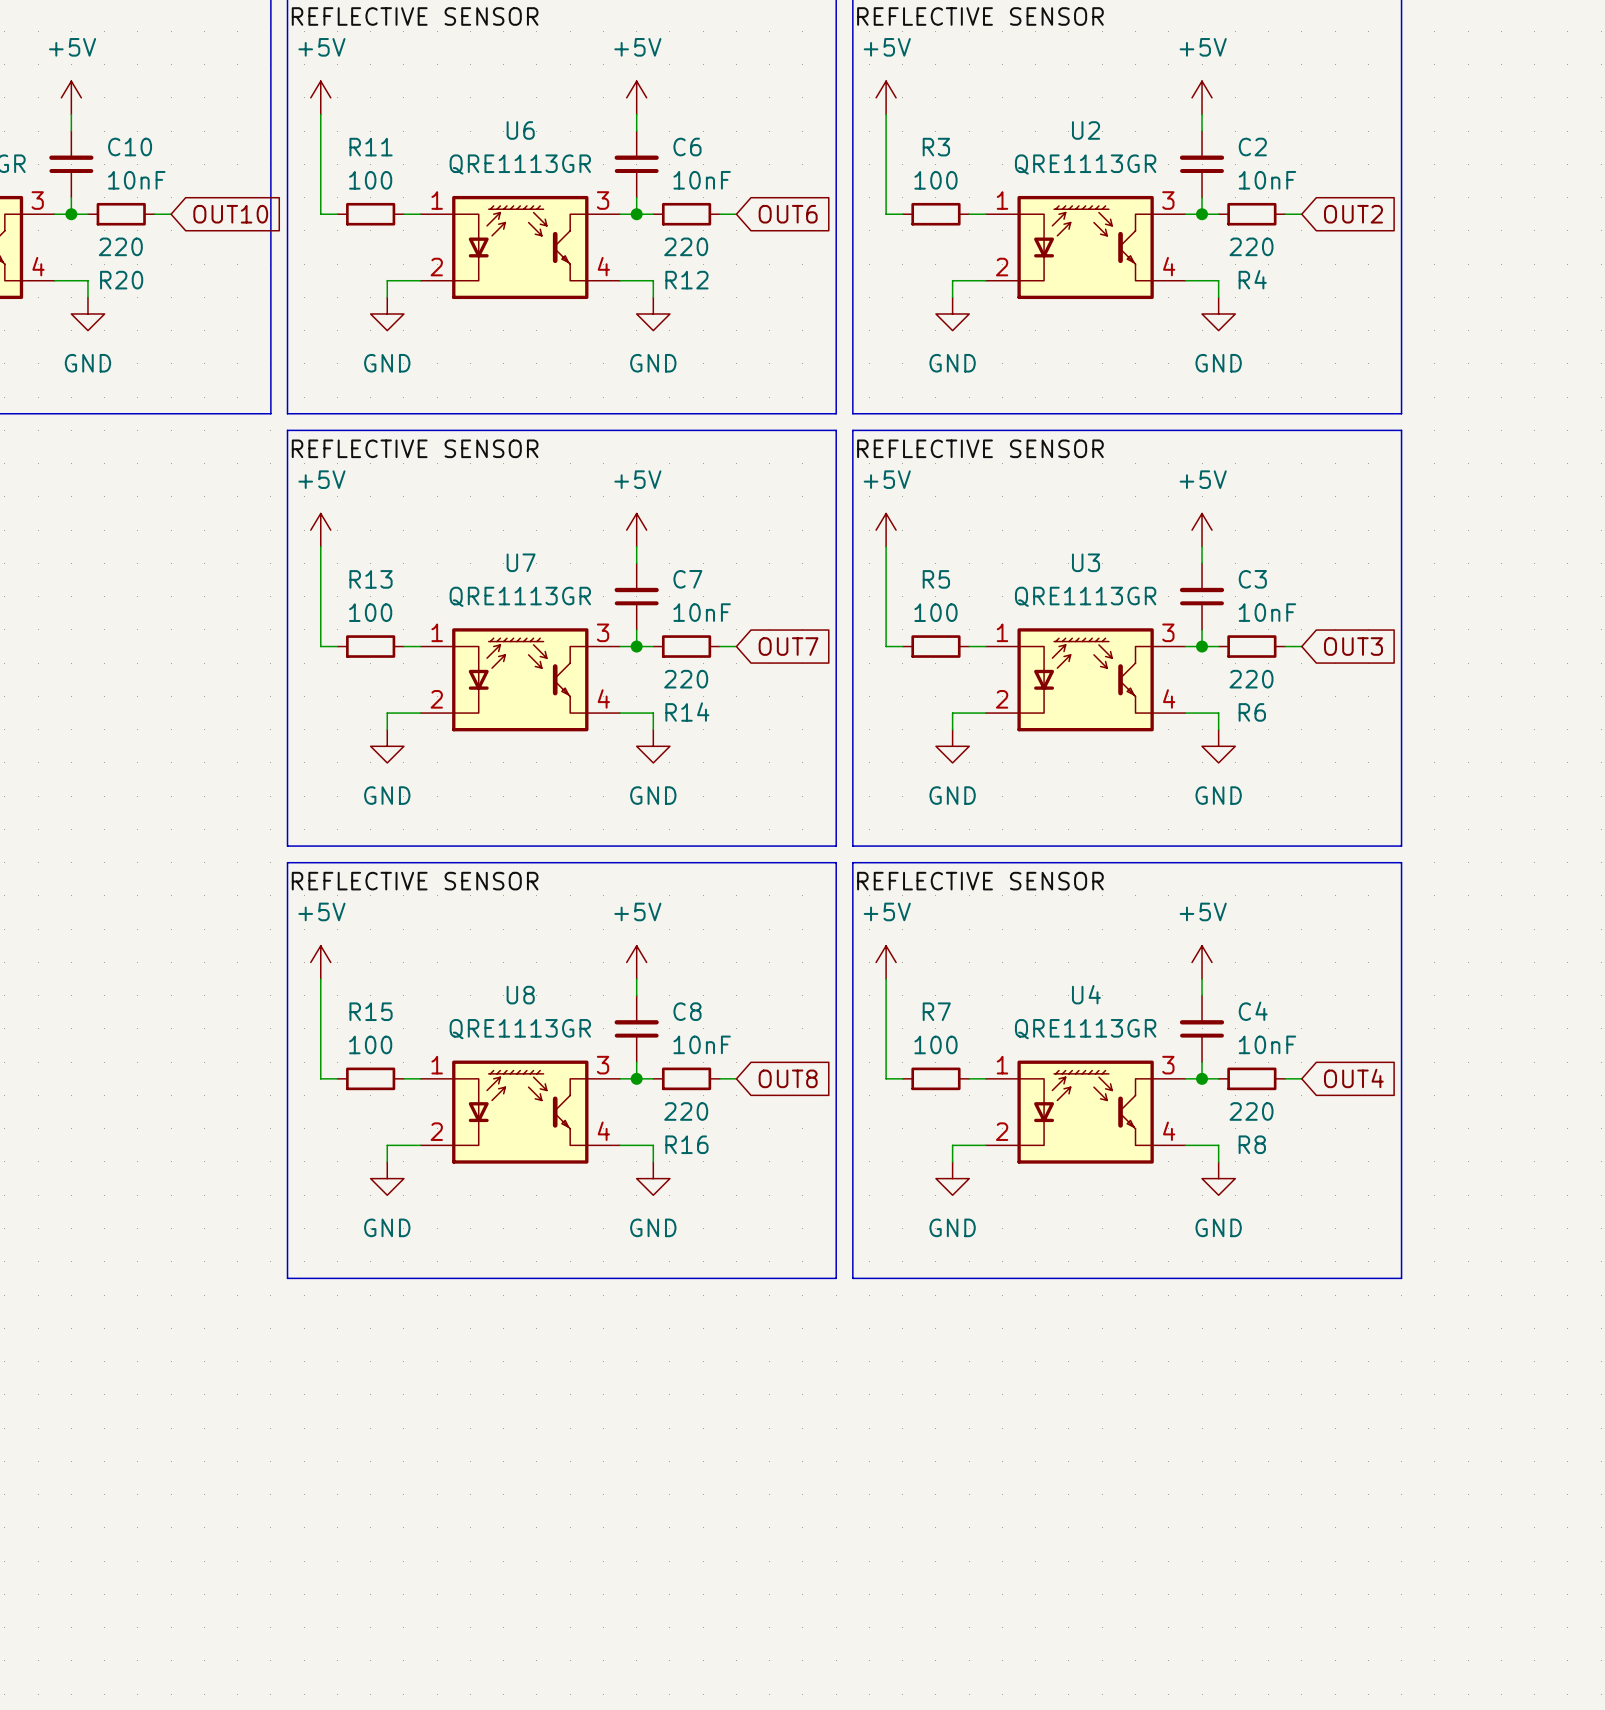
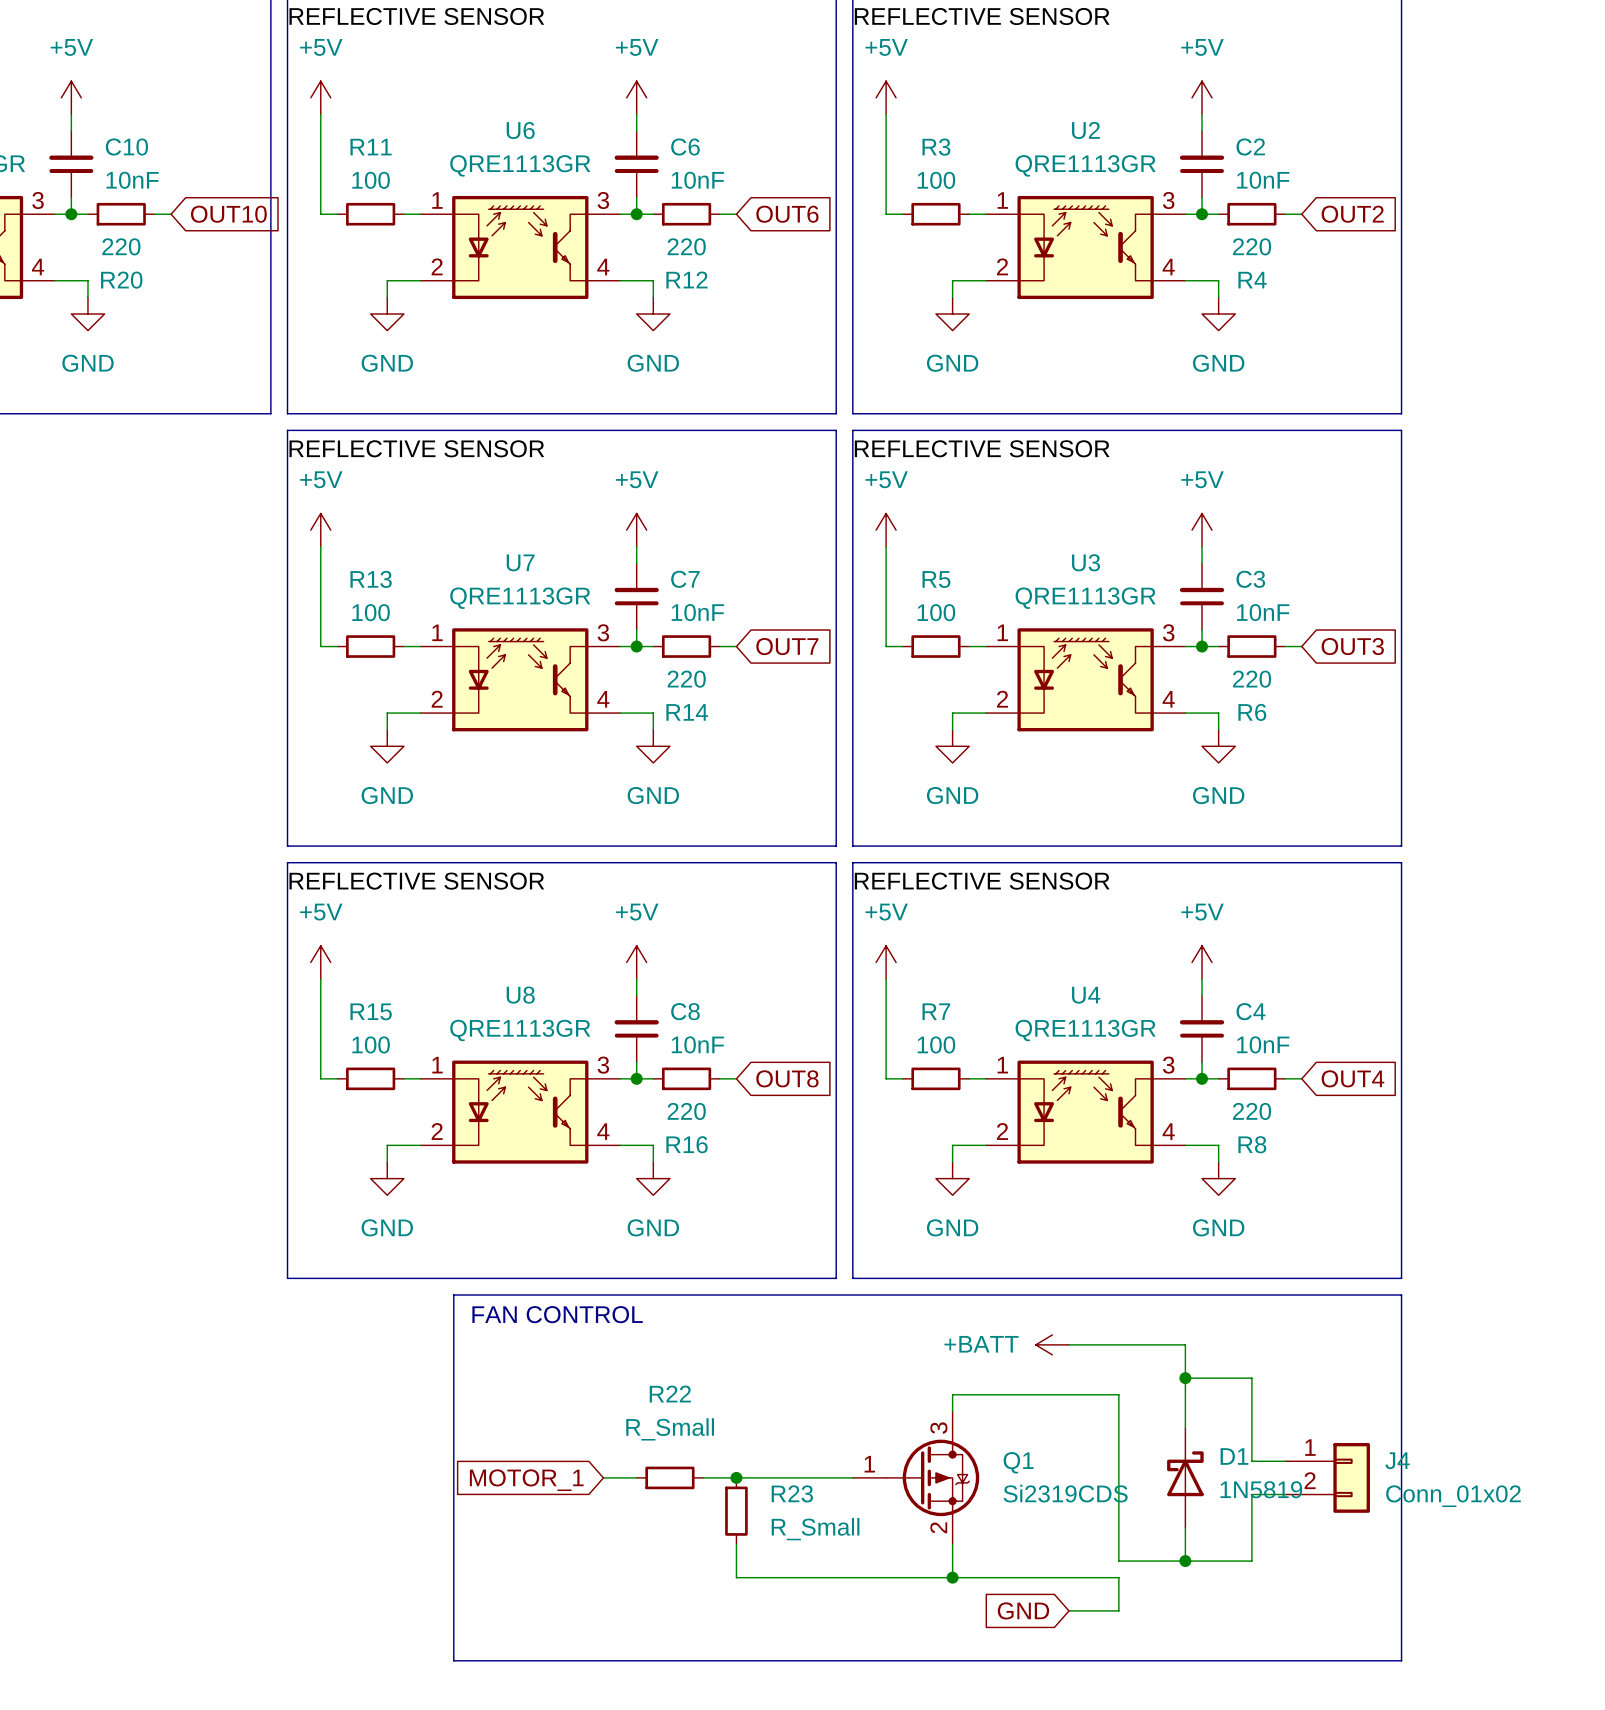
line: none -> (453, 1295) (453, 1660) (1401, 1660) (1401, 1295) (453, 1295)
text: none -> FAN CONTROL (557, 1314)
power symbol: none -> +BATT (1052, 1344)
wire: none -> (1068, 1344) (1185, 1344) (1185, 1428)
wire: none -> (1185, 1378) (1251, 1378) (1251, 1461) (1285, 1461)
junction: none -> (1185, 1378)
wire: none -> (952, 1411) (952, 1394) (1118, 1394) (1118, 1561) (1251, 1561) (1251, 1494) (1285, 1494)
wire: none -> (603, 1477) (636, 1477)
R22: none -> R_Small (669, 1477)
wire: none -> (703, 1477) (852, 1477)
junction: none -> (736, 1477)
Q1: none -> Si2319CDS (916, 1477)
D1: none -> 1N5819 (1185, 1477)
J4: none -> Conn_01x02 (1327, 1477)
global label: none -> MOTOR_1 (526, 1480)
R23: none -> R_Small (736, 1511)
wire: none -> (1185, 1527) (1185, 1561)
wire: none -> (736, 1544) (736, 1577) (1118, 1577) (1118, 1610) (1068, 1610)
wire: none -> (952, 1544) (952, 1577)
junction: none -> (1185, 1561)
junction: none -> (952, 1577)
global label: none -> GND (1023, 1610)

